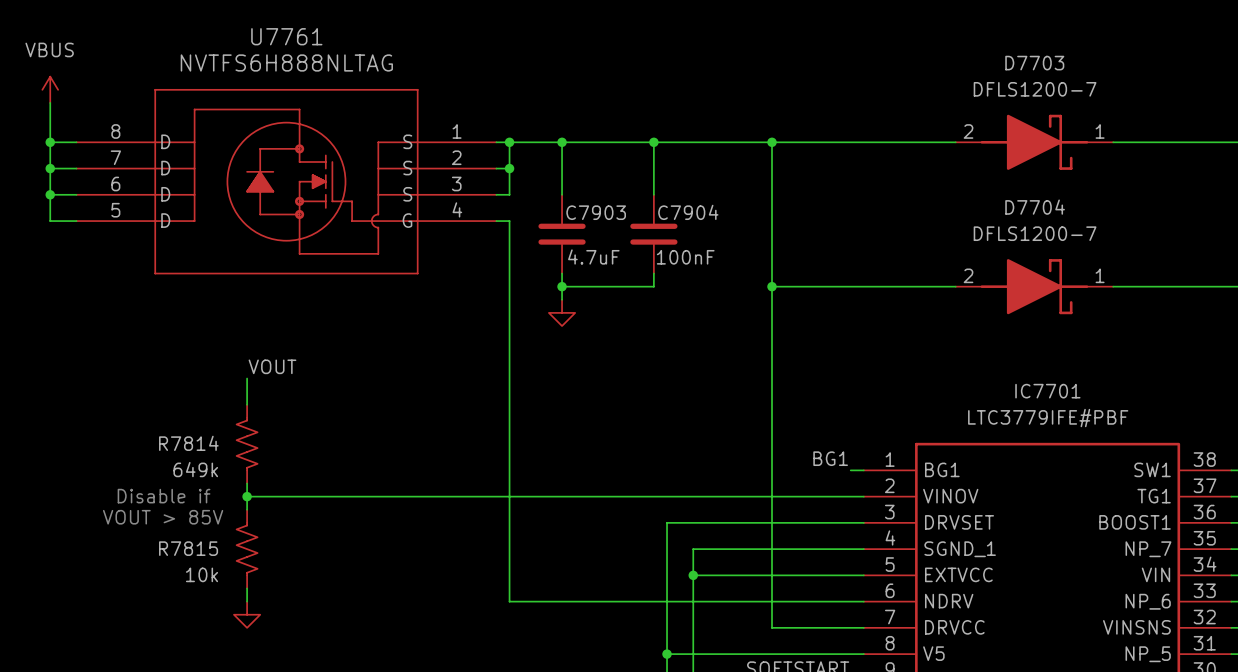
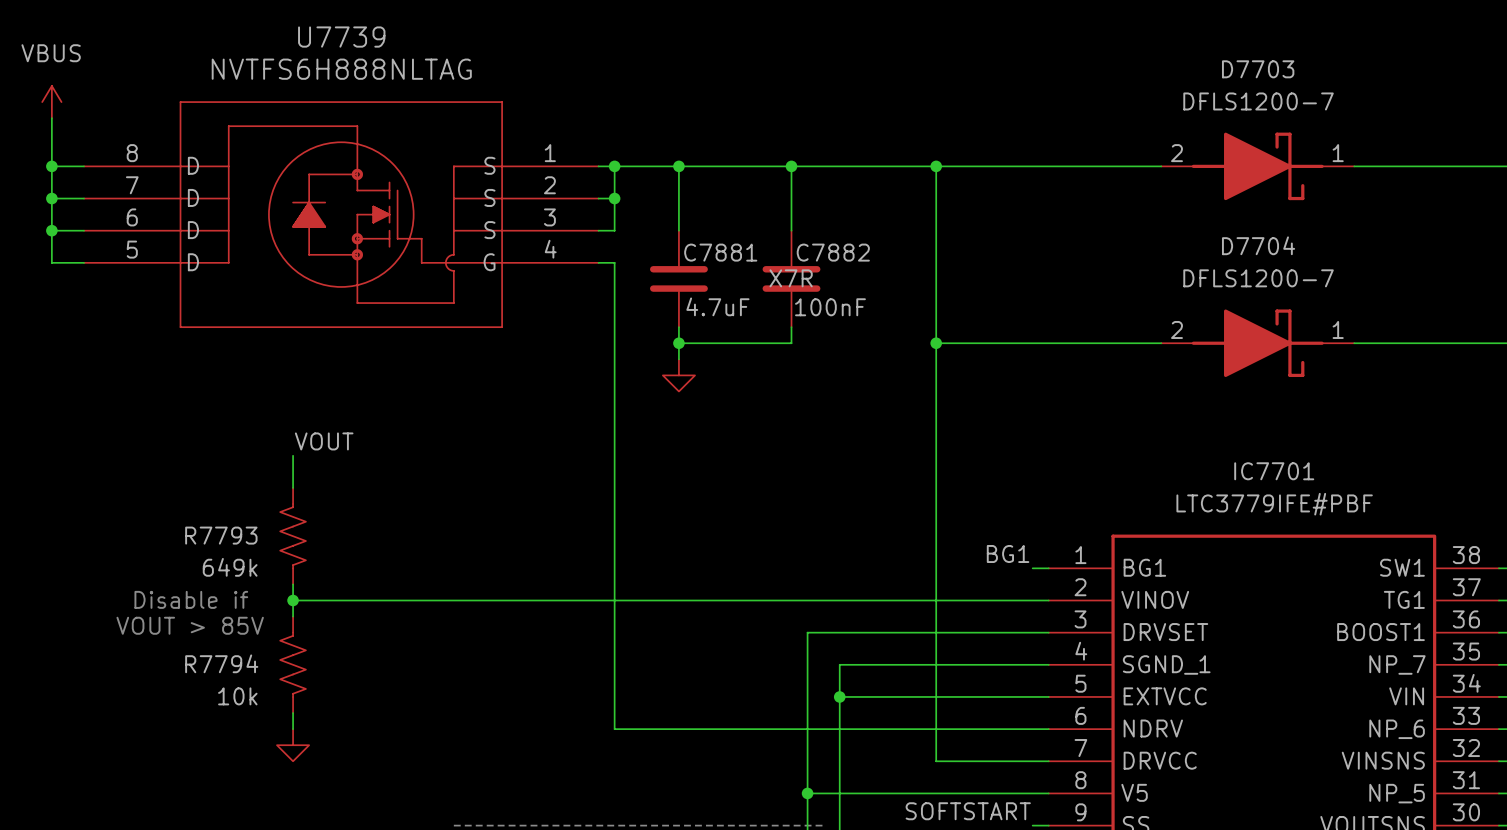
U7761 name: U7761 (286, 36) -> U7739 (341, 37)
C7903 name: C7903 (596, 212) -> C7881 (720, 252)
C7904 name: C7904 (688, 212) -> C7882 (833, 252)
C7904 text: none -> X7R (791, 278)
R7814 name: R7814 (188, 443) -> R7793 (221, 535)
R7815 name: R7815 (188, 548) -> R7794 (221, 663)

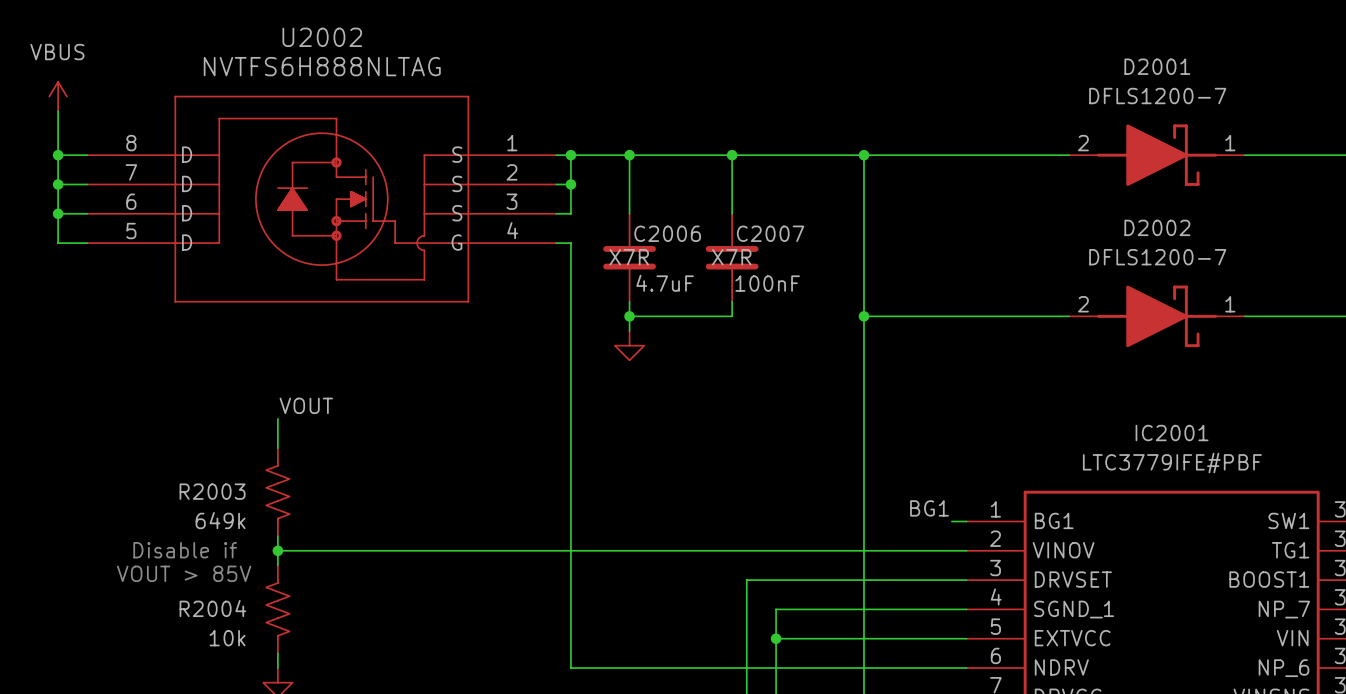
U7739 name: U7739 (341, 37) -> U2002 (322, 37)
D7703 name: D7703 (1258, 69) -> D2001 (1157, 66)
D7704 name: D7704 (1258, 245) -> D2002 (1157, 227)
C7881 name: C7881 (720, 252) -> C2006 (667, 233)
C7882 name: C7882 (833, 252) -> C2007 (770, 233)
C7881 text: none -> X7R (629, 257)
IC7701 name: IC7701 (1274, 471) -> IC2001 (1172, 433)
R7793 name: R7793 (221, 535) -> R2003 (212, 491)
R7794 name: R7794 (221, 663) -> R2004 (212, 608)

